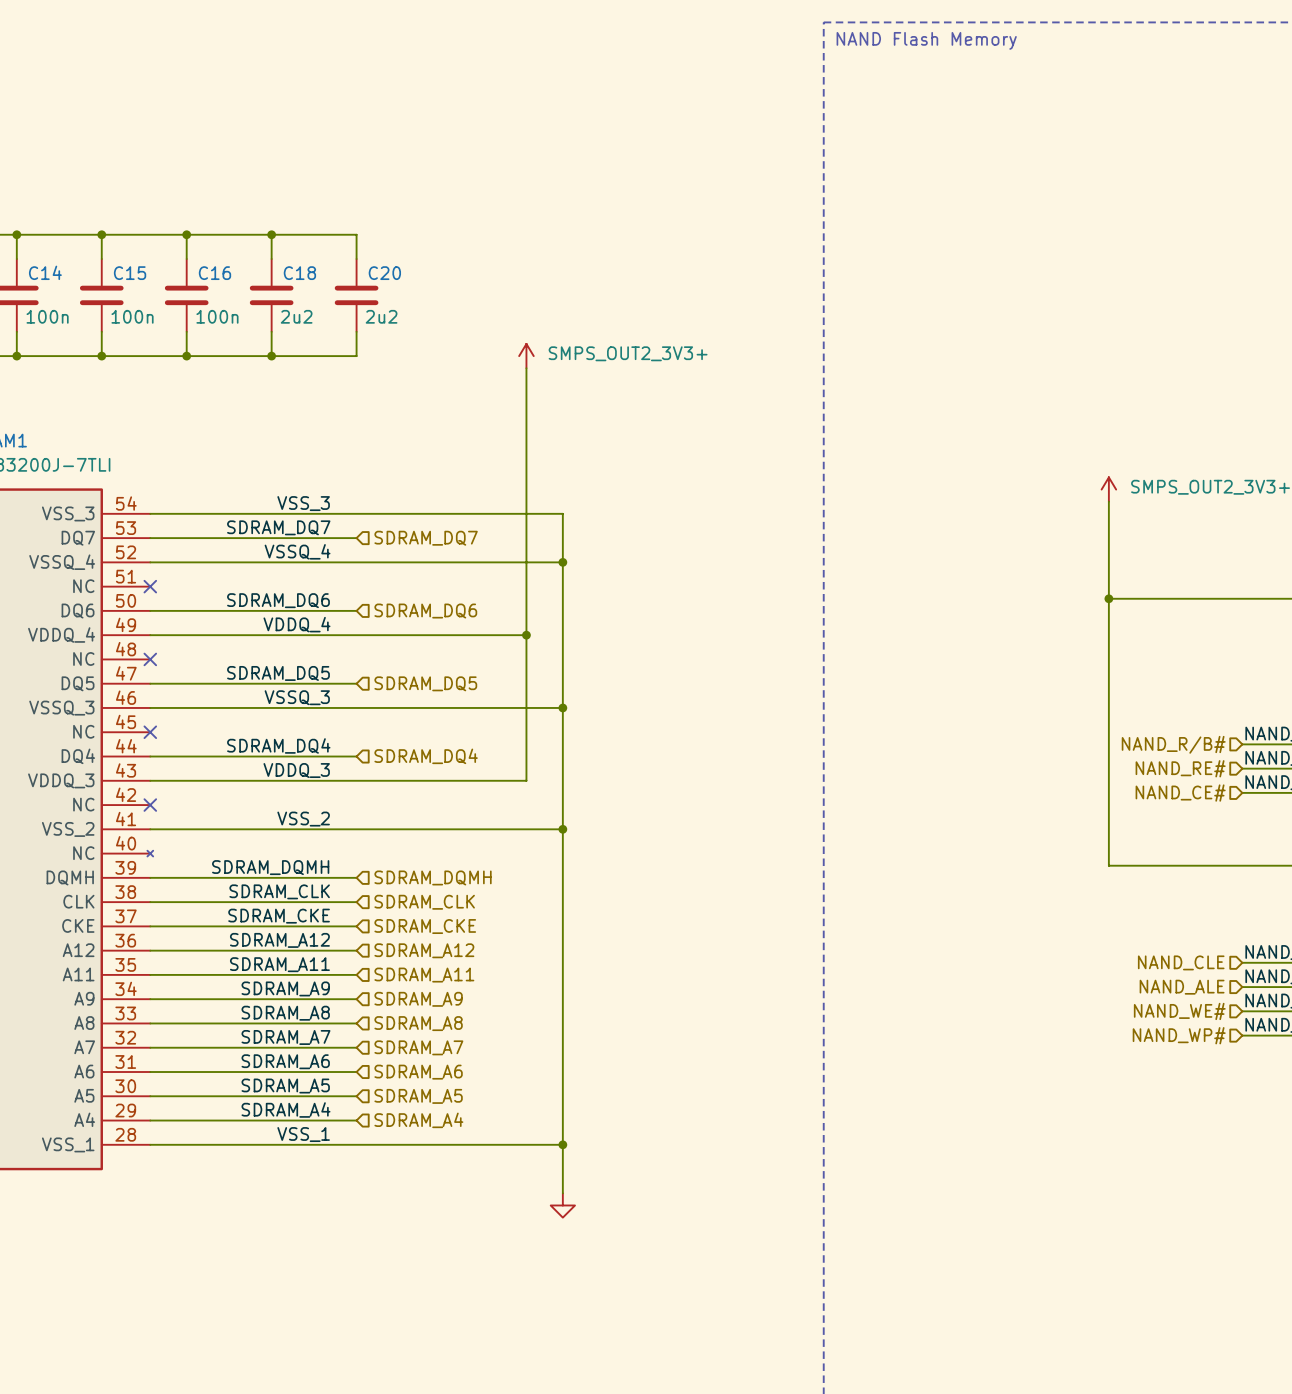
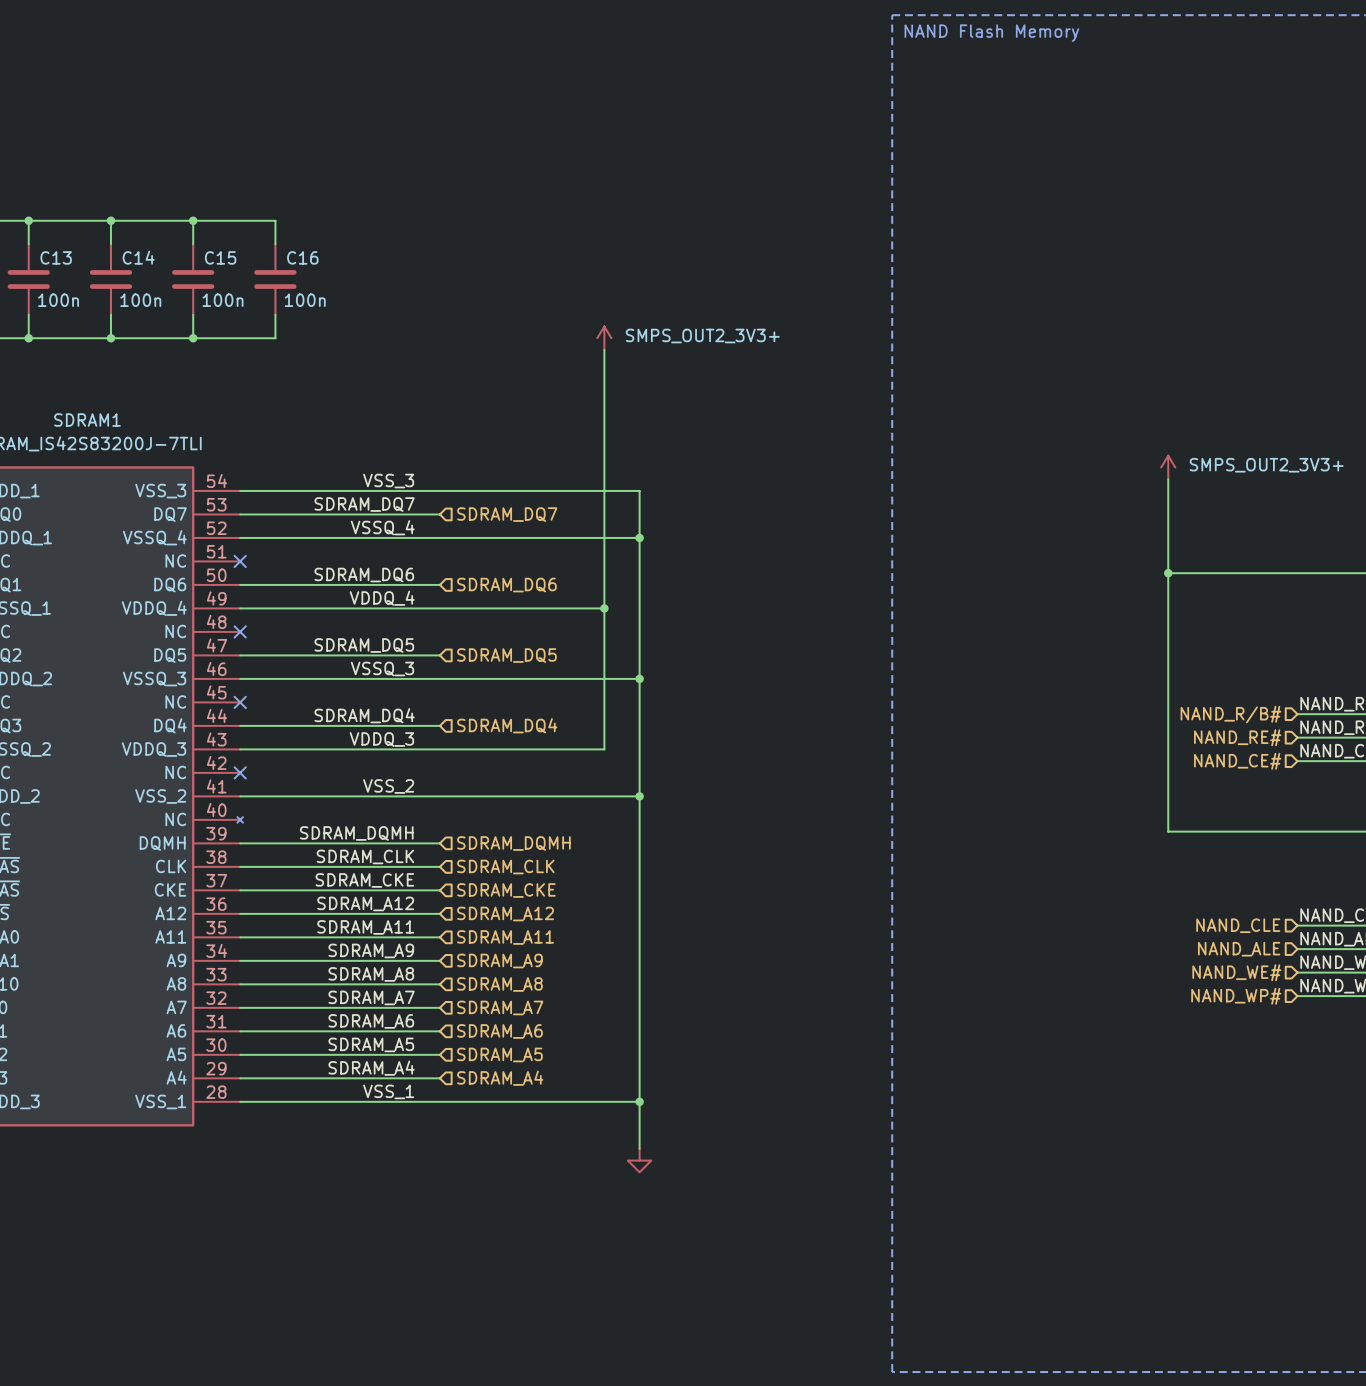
wire: (186, 234) (356, 234) (356, 259) -> none
junction: (186, 234) -> none
wire: (271, 234) (271, 259) -> none
junction: (271, 234) -> none
C18: 2u2 (271, 295) -> none
C20: 2u2 (356, 295) -> none
wire: (271, 331) (271, 356) -> none
wire: (356, 331) (356, 356) (186, 356) -> none
junction: (186, 356) -> none
junction: (271, 356) -> none

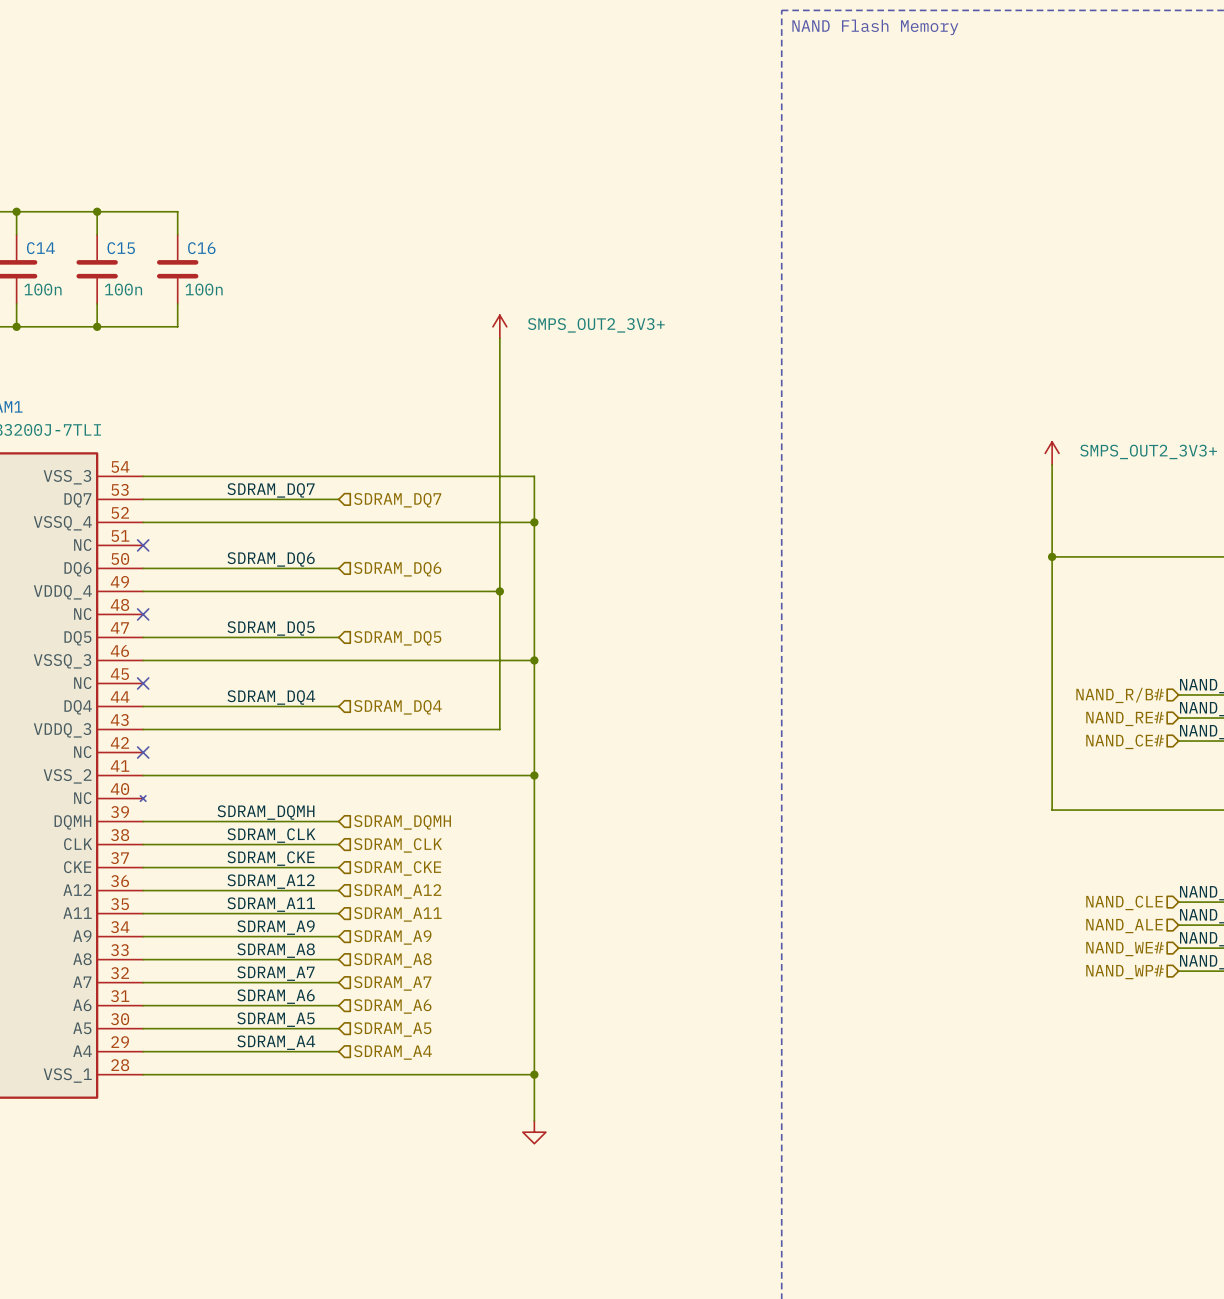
label: VSS_3 (388, 481) -> none
label: VSSQ_4 (382, 527) -> none
label: VDDQ_4 (382, 598) -> none
label: VSSQ_3 (382, 668) -> none
label: VDDQ_3 (381, 739) -> none
label: VSS_2 (388, 786) -> none
label: VSS_1 (388, 1091) -> none

